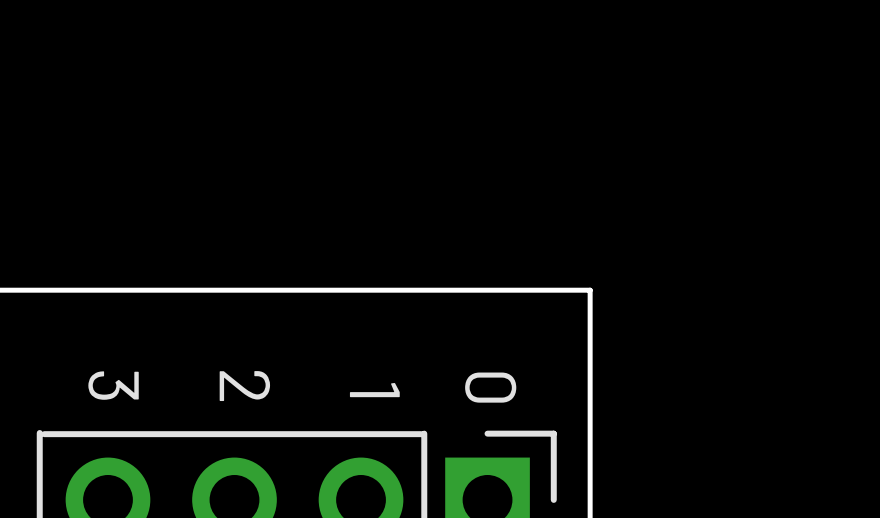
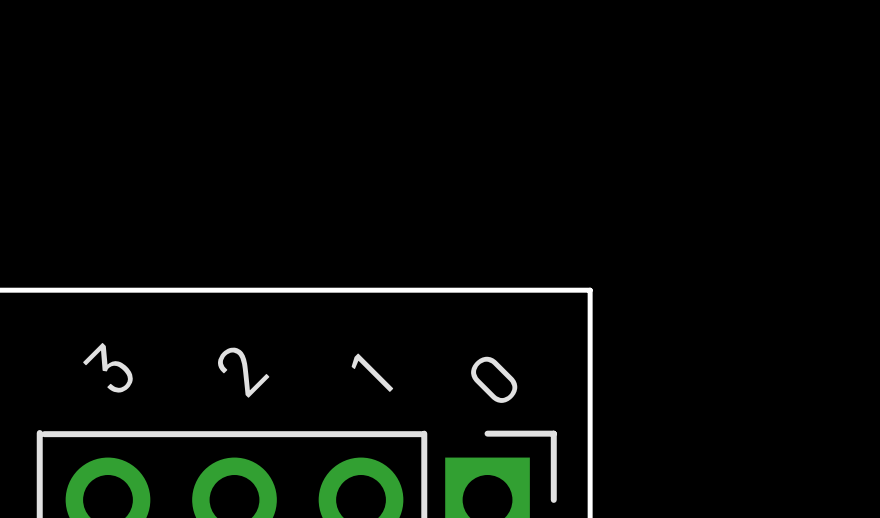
text rotation: 0° (113, 385) -> 135° counterclockwise (108, 367)
text rotation: 0° (244, 386) -> 135° counterclockwise (243, 372)
text rotation: 0° (490, 387) -> 45° clockwise (494, 379)
text rotation: 0° (374, 390) -> 135° counterclockwise (372, 372)

